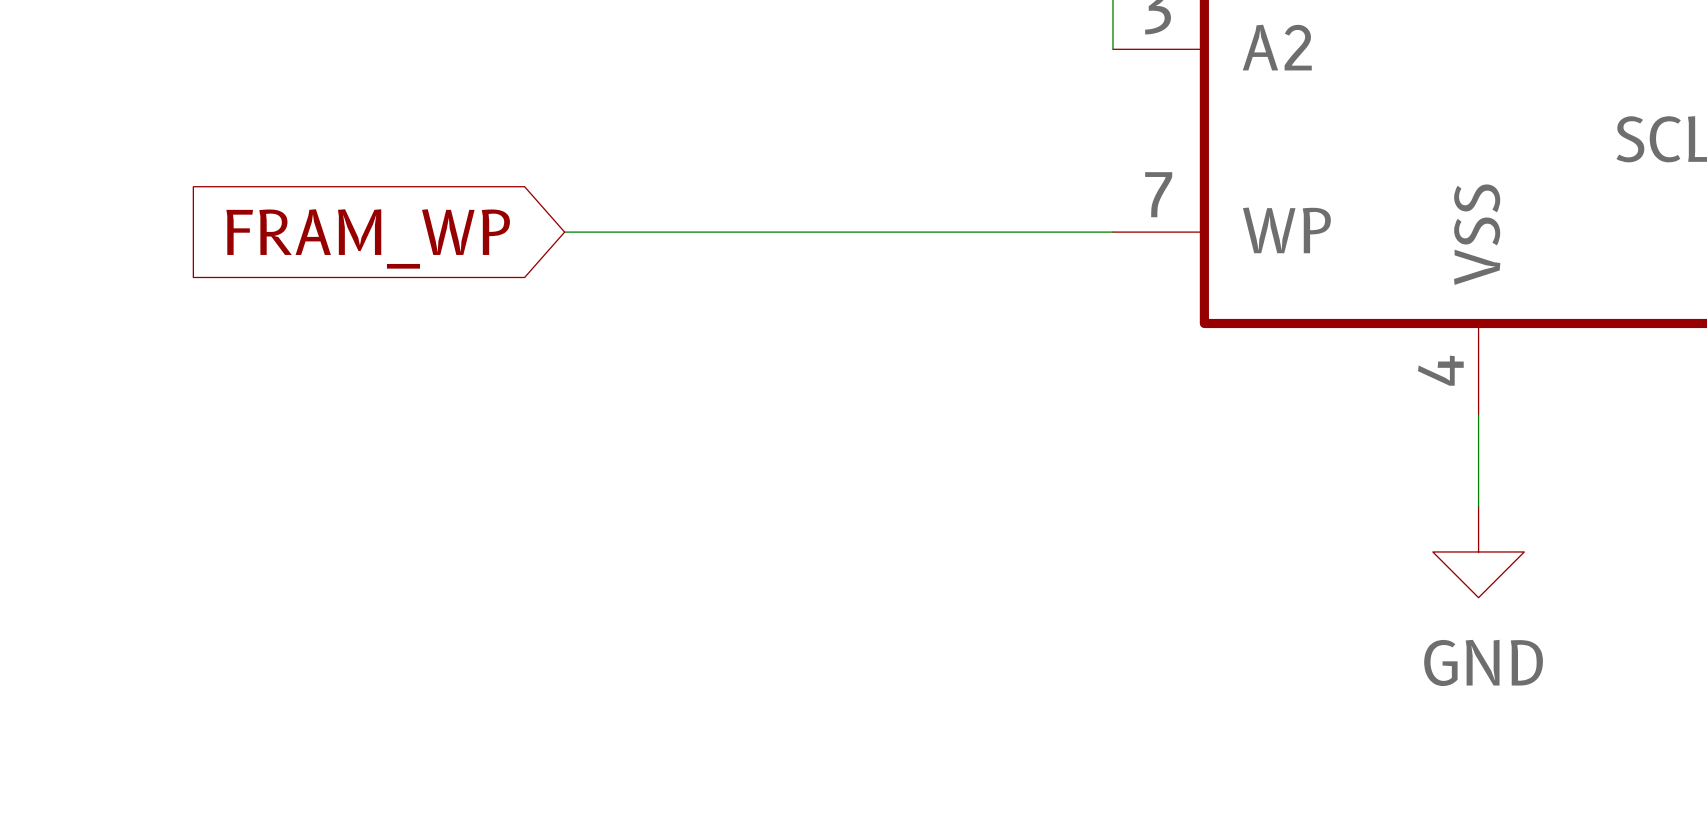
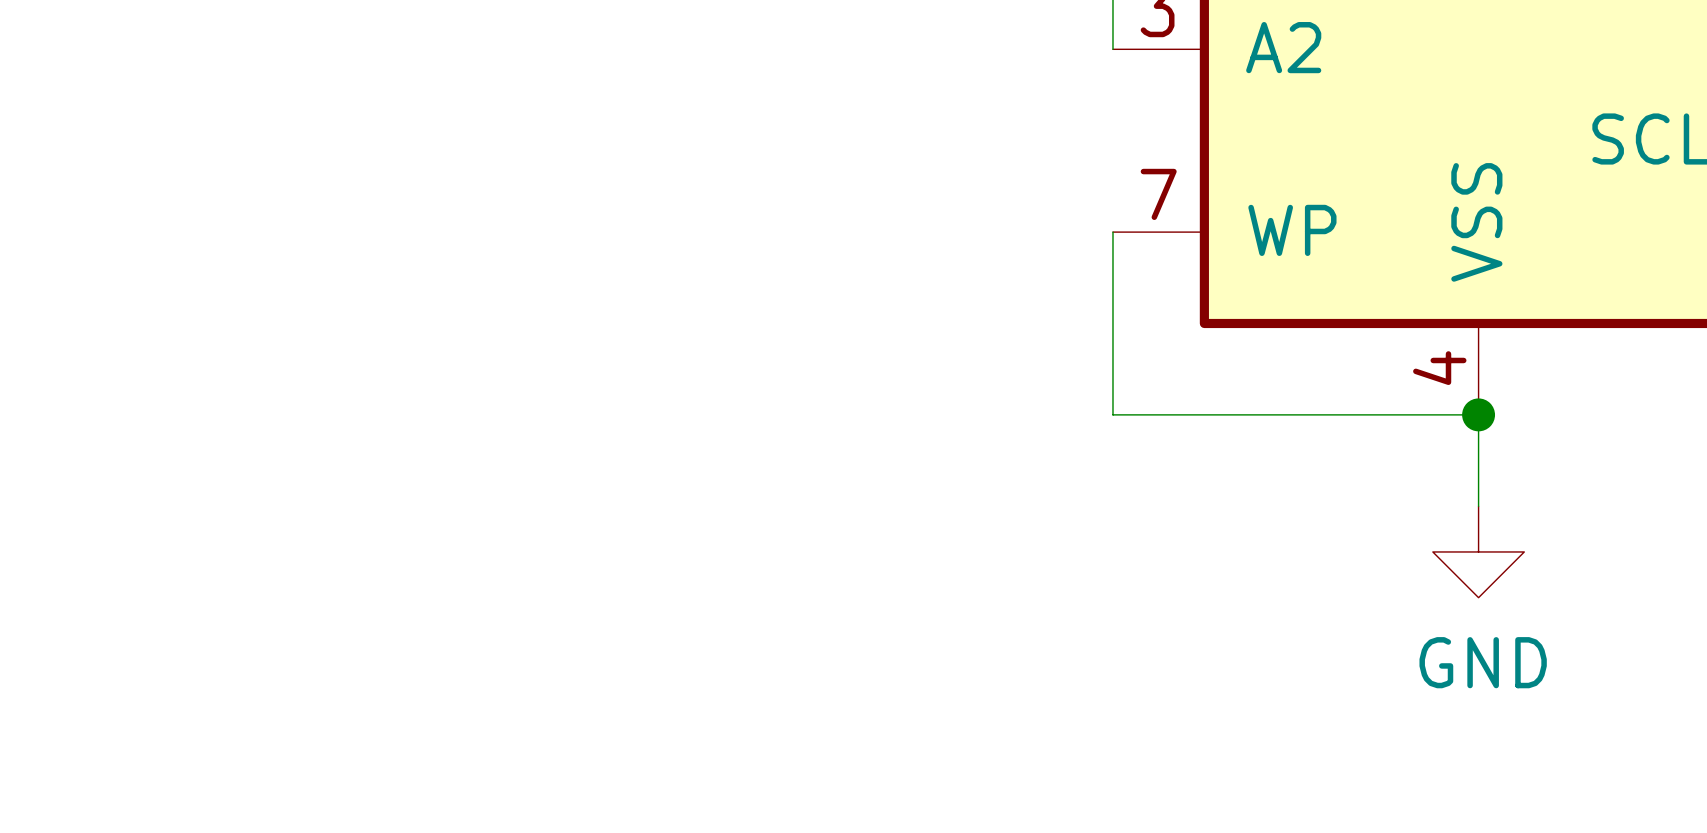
wire: (564, 232) (1112, 232) -> (1478, 414) (1112, 414) (1112, 232)
global label: FRAM_WP (368, 238) -> none
junction: none -> (1478, 414)

